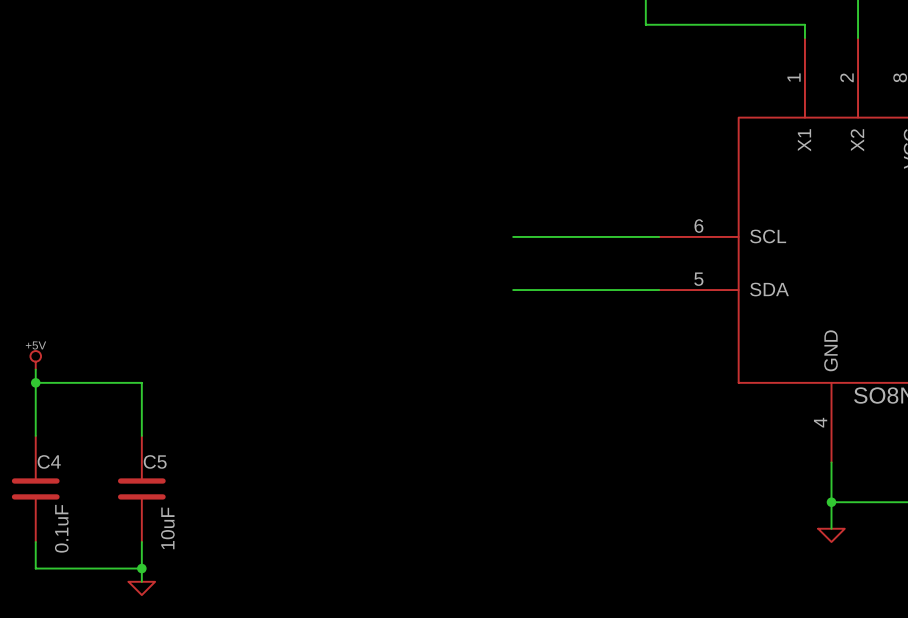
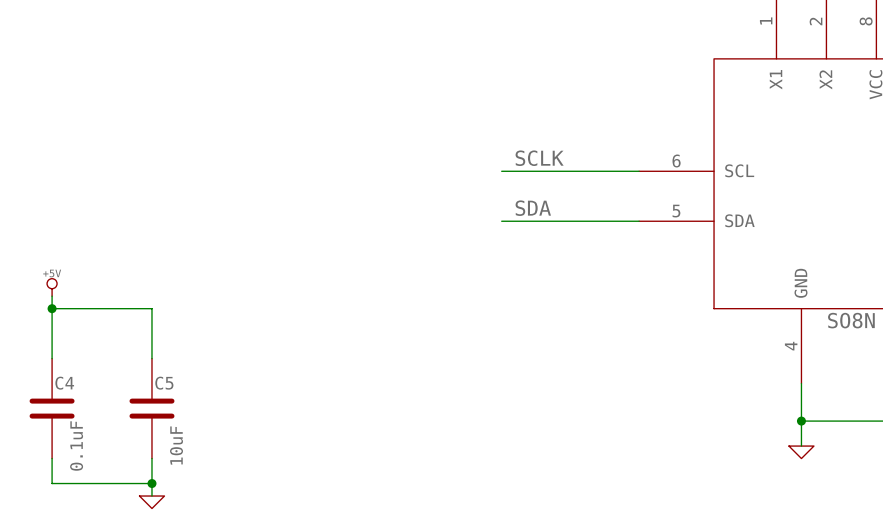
label: none -> SCLK (539, 158)
label: none -> SDA (533, 208)

